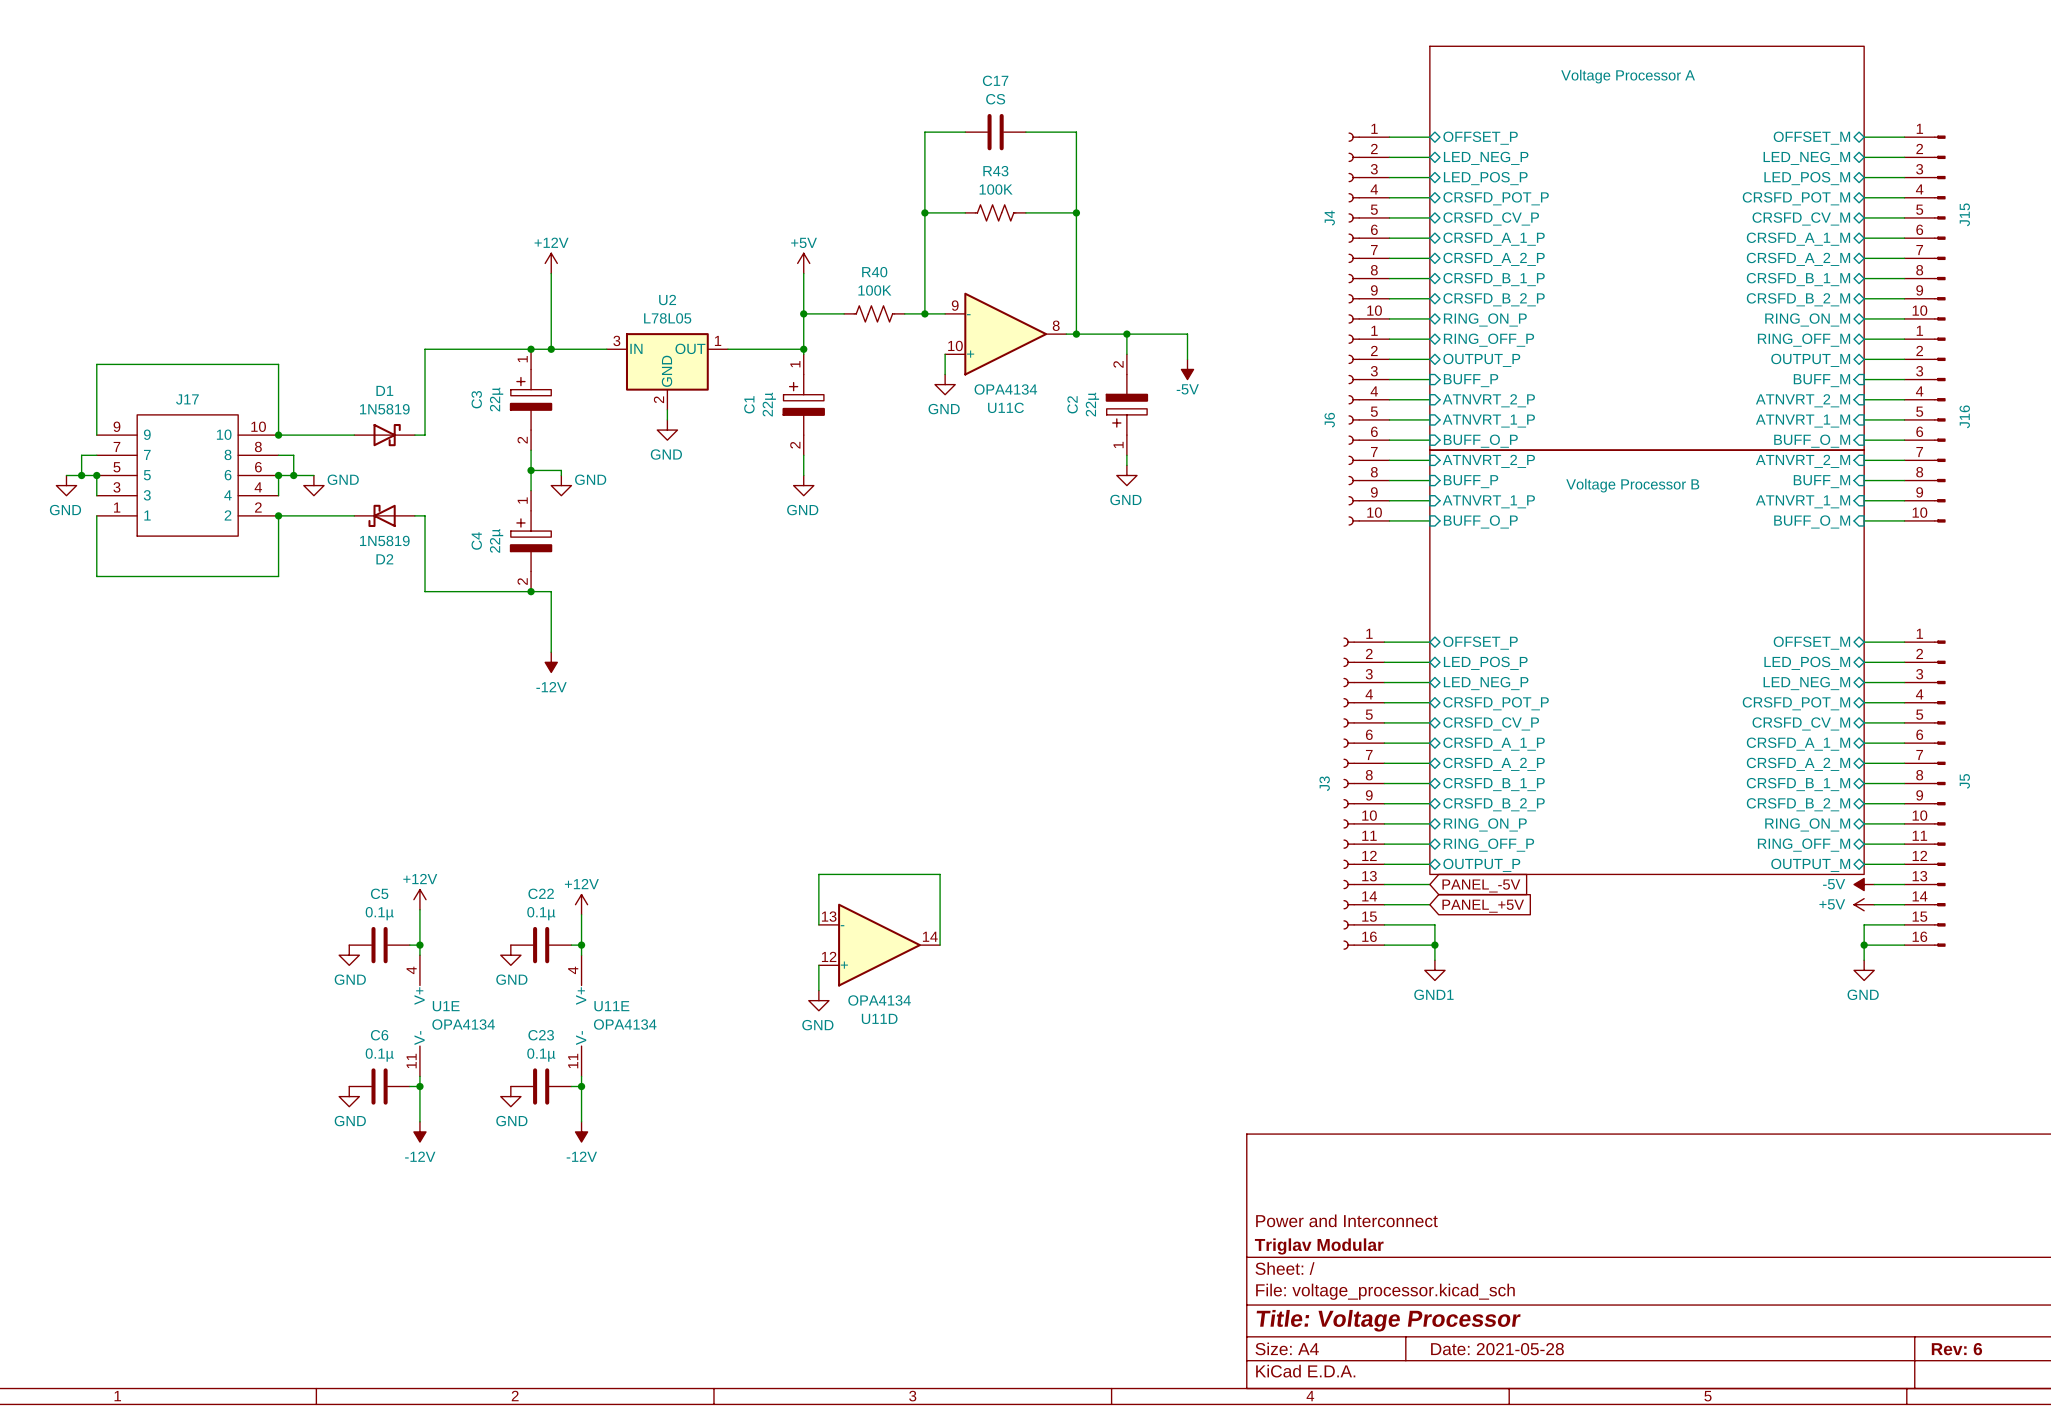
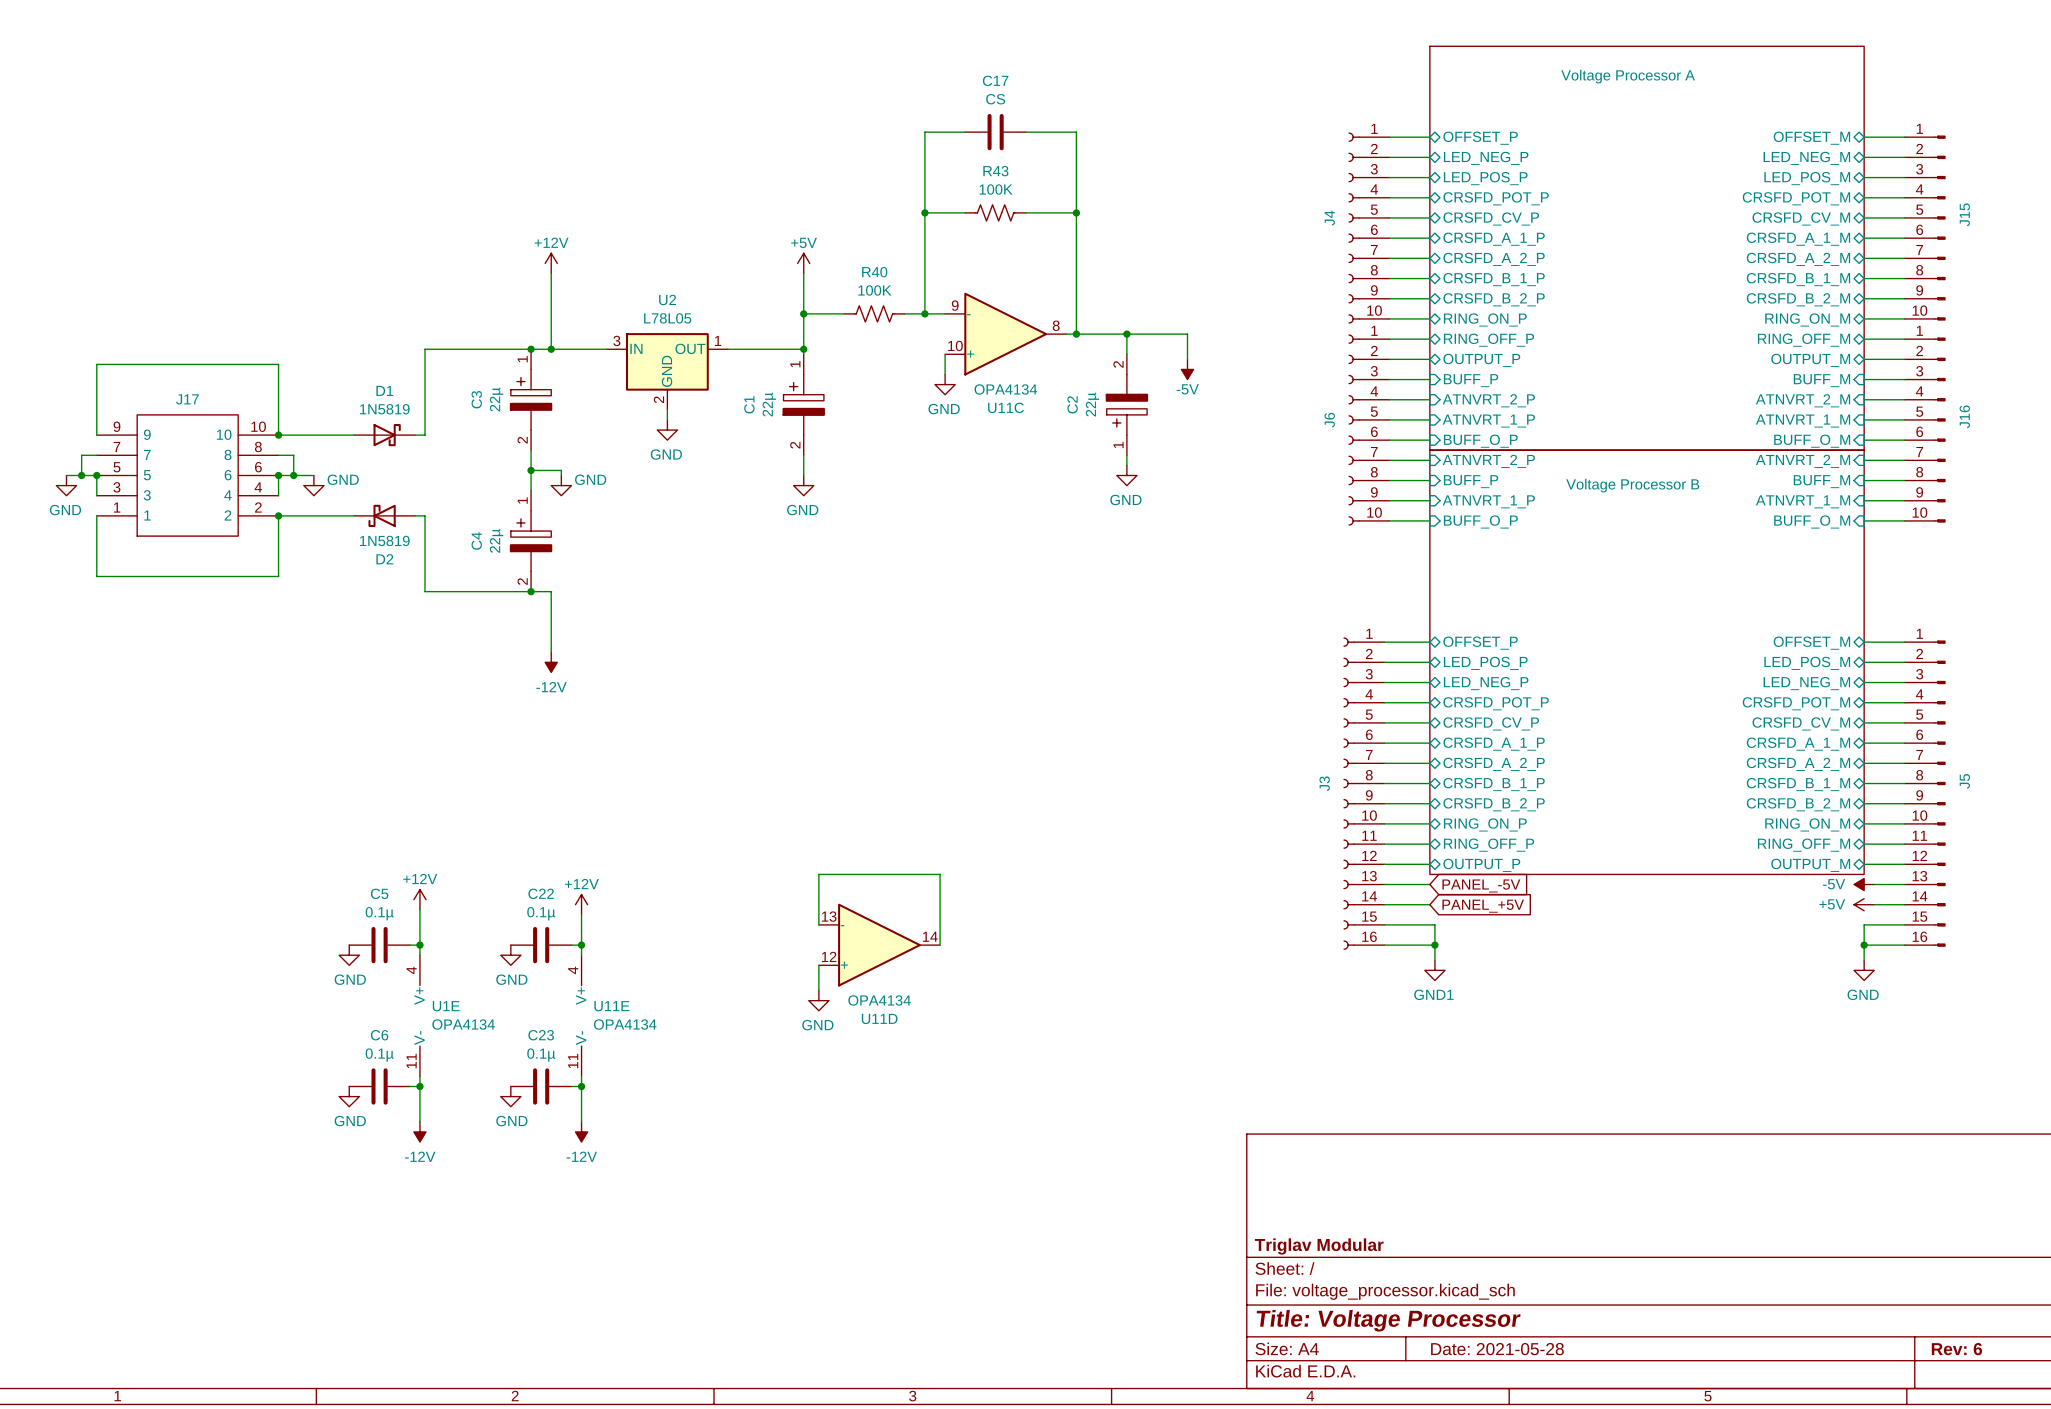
title block: Power and Interconnect (1346, 1220) -> none

